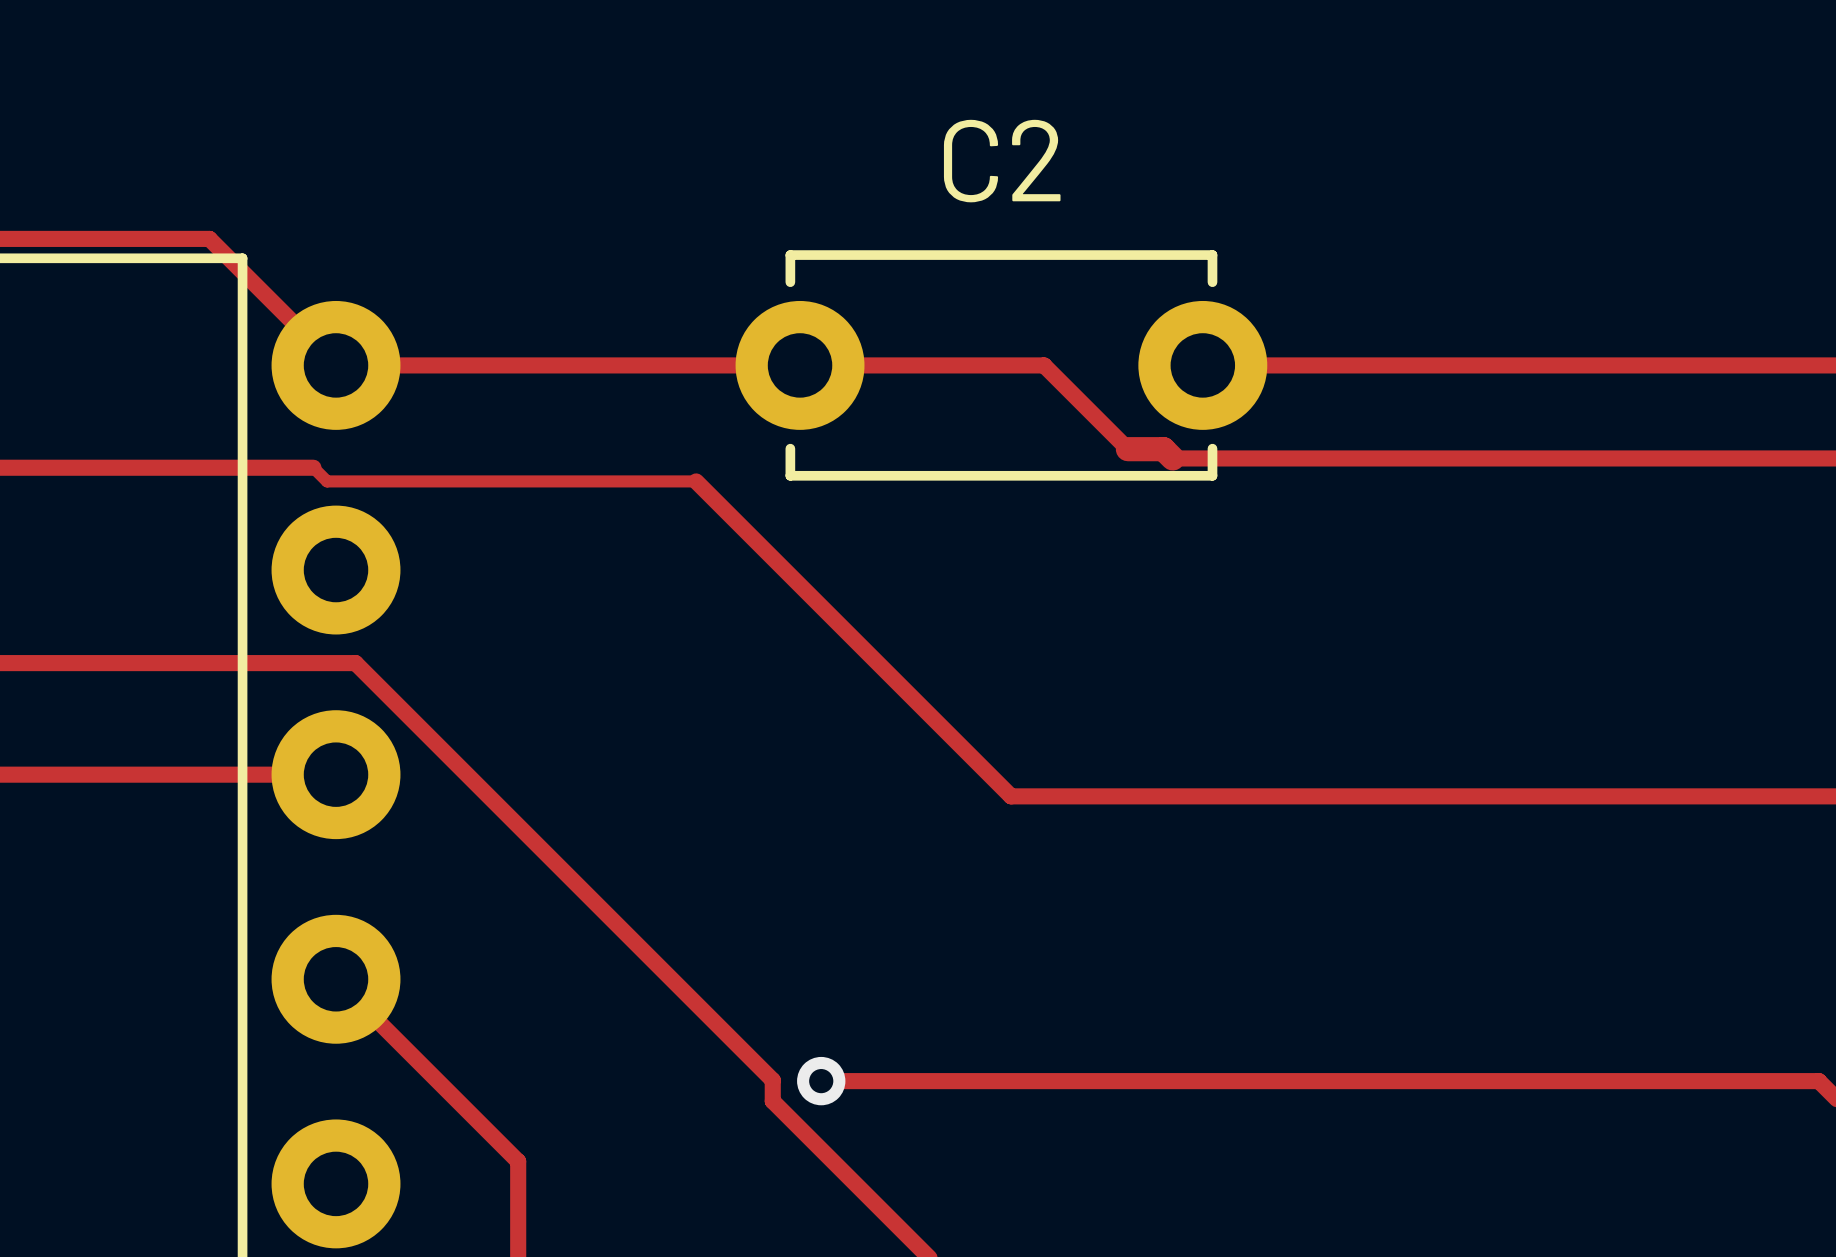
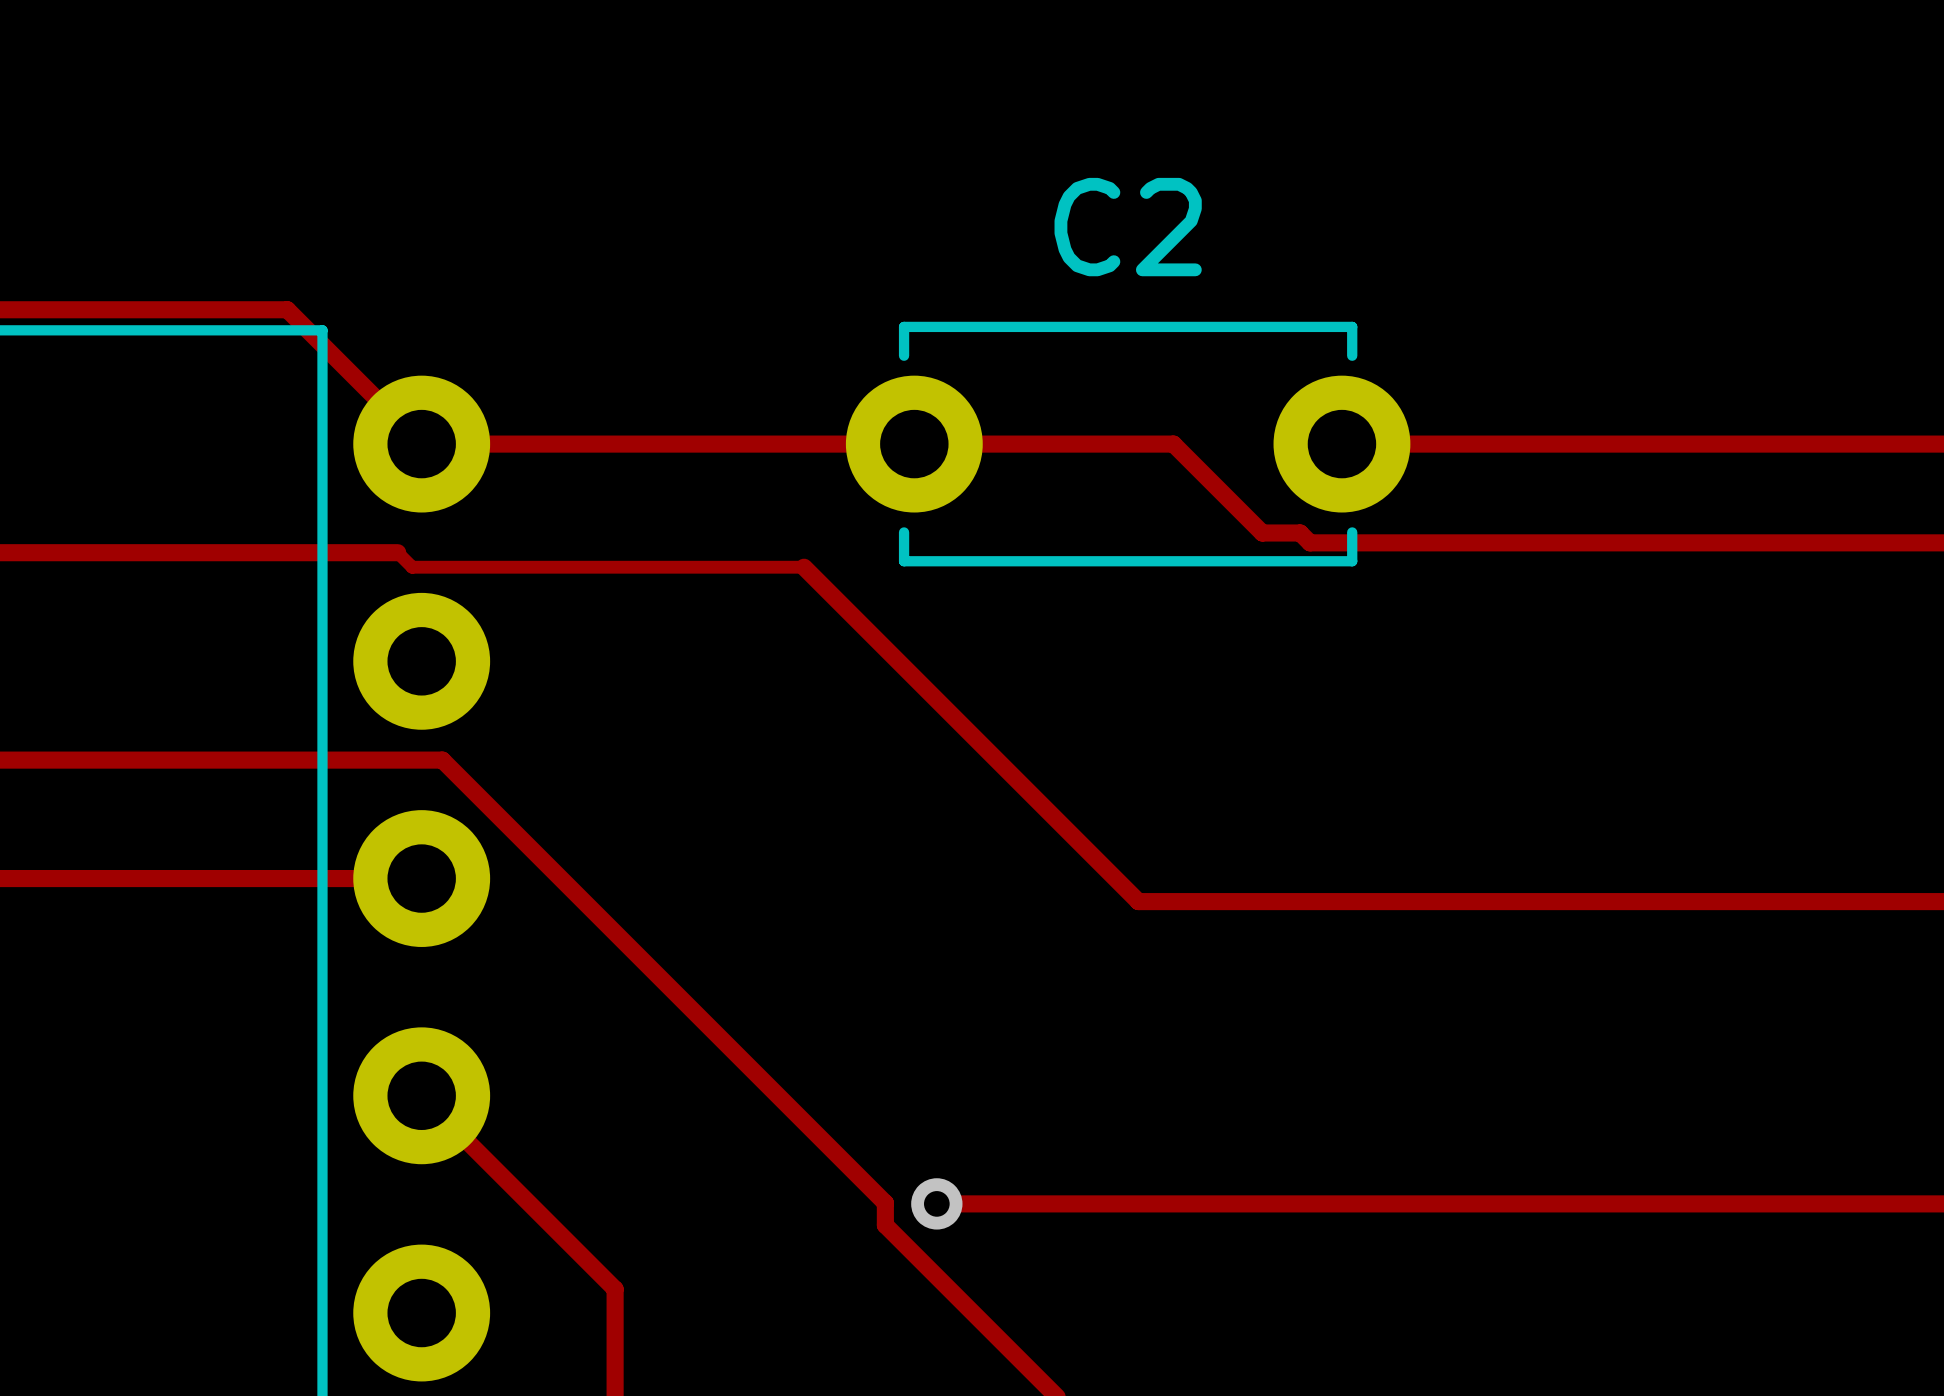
track width: thick (1127, 449) (1163, 449) (1172, 458) -> thin (1262, 532) (1300, 532) (1310, 542)

